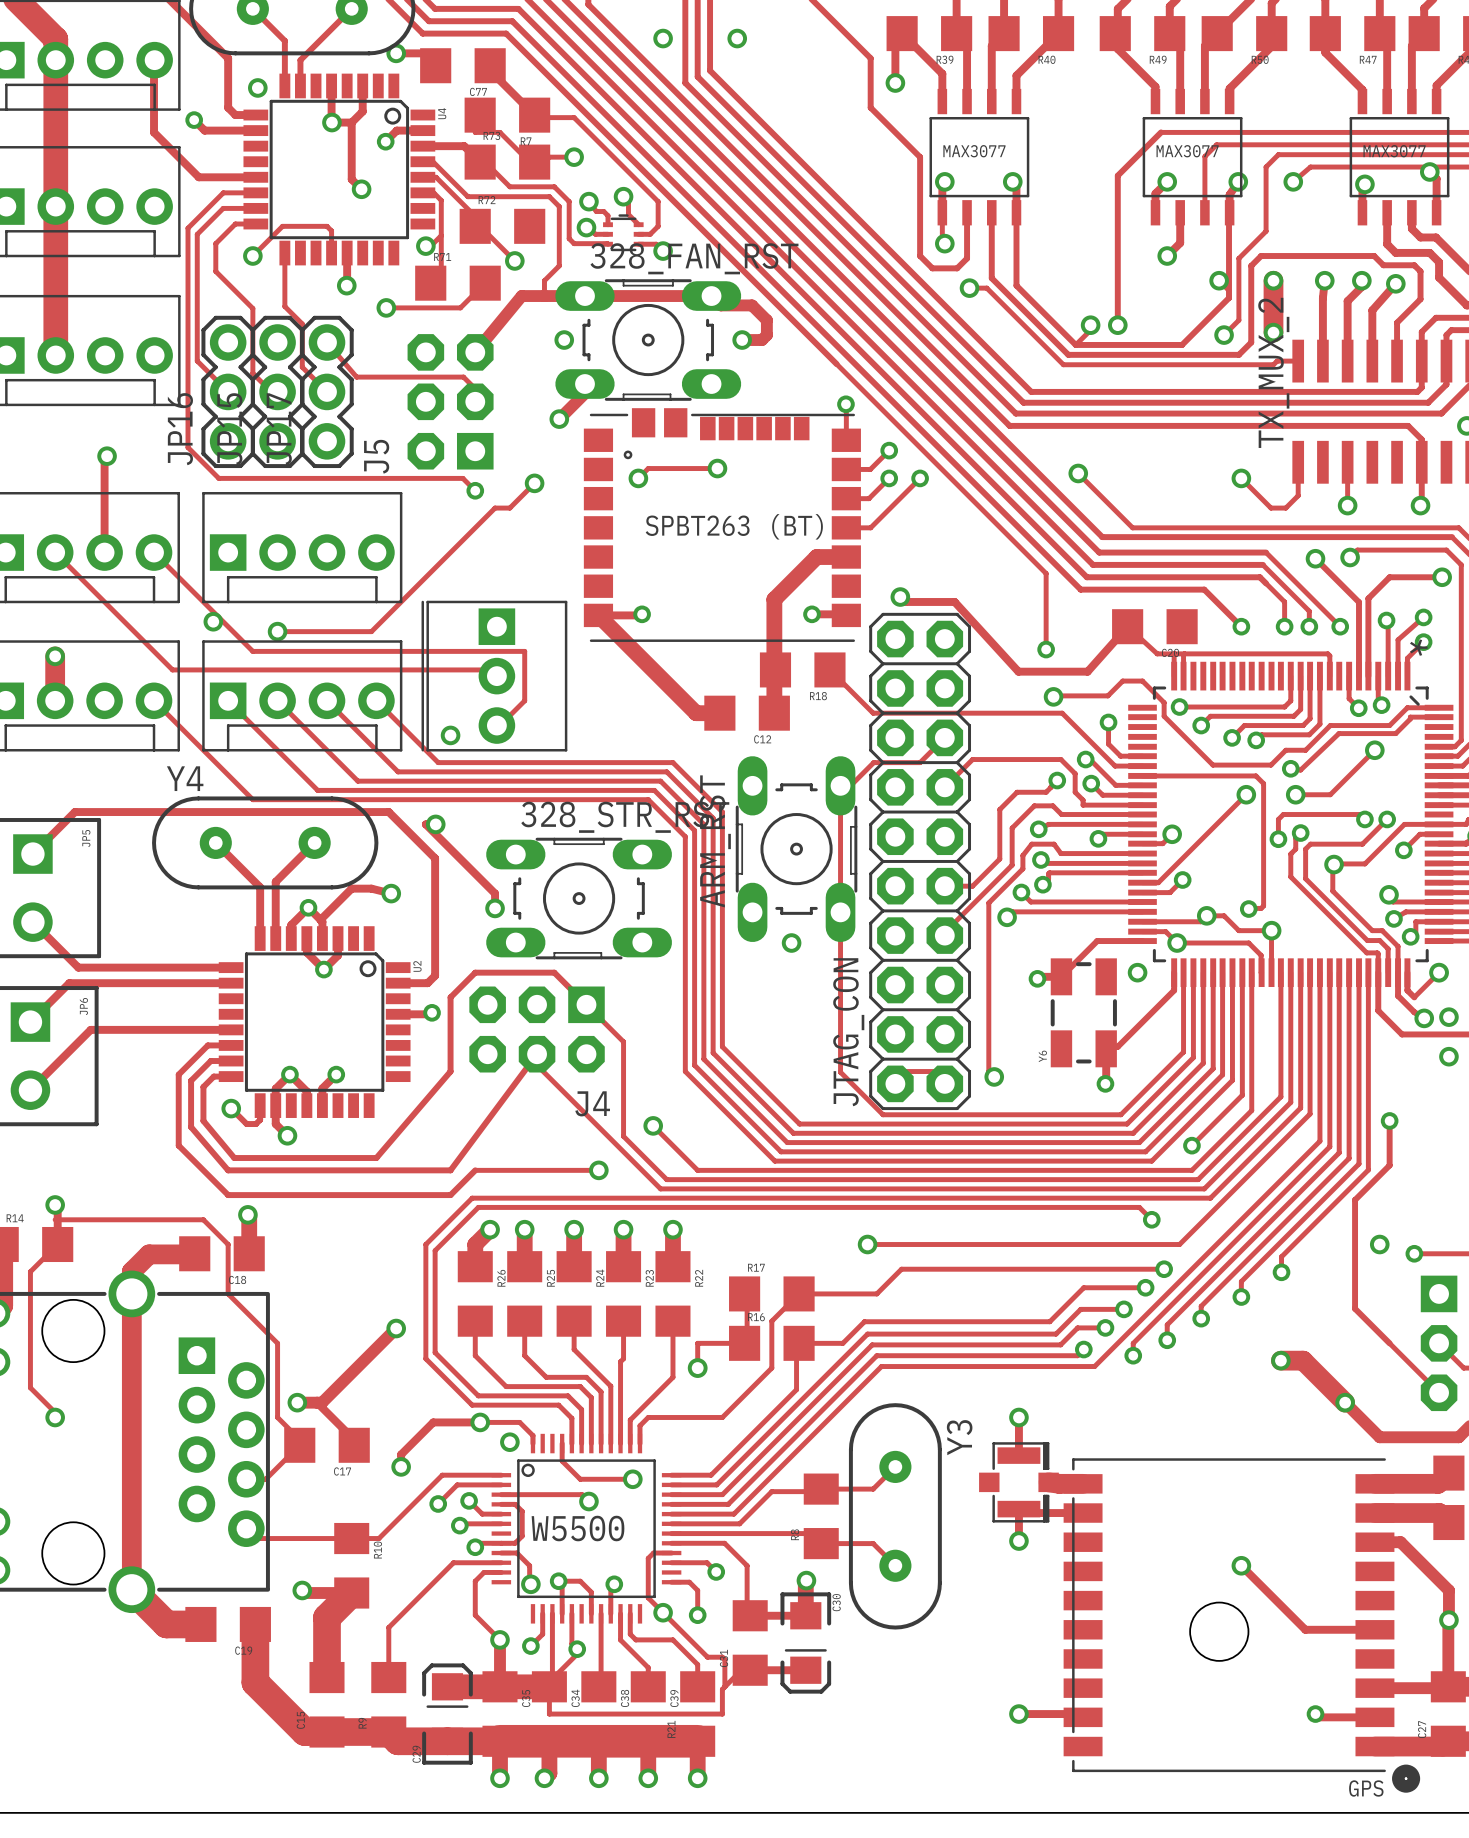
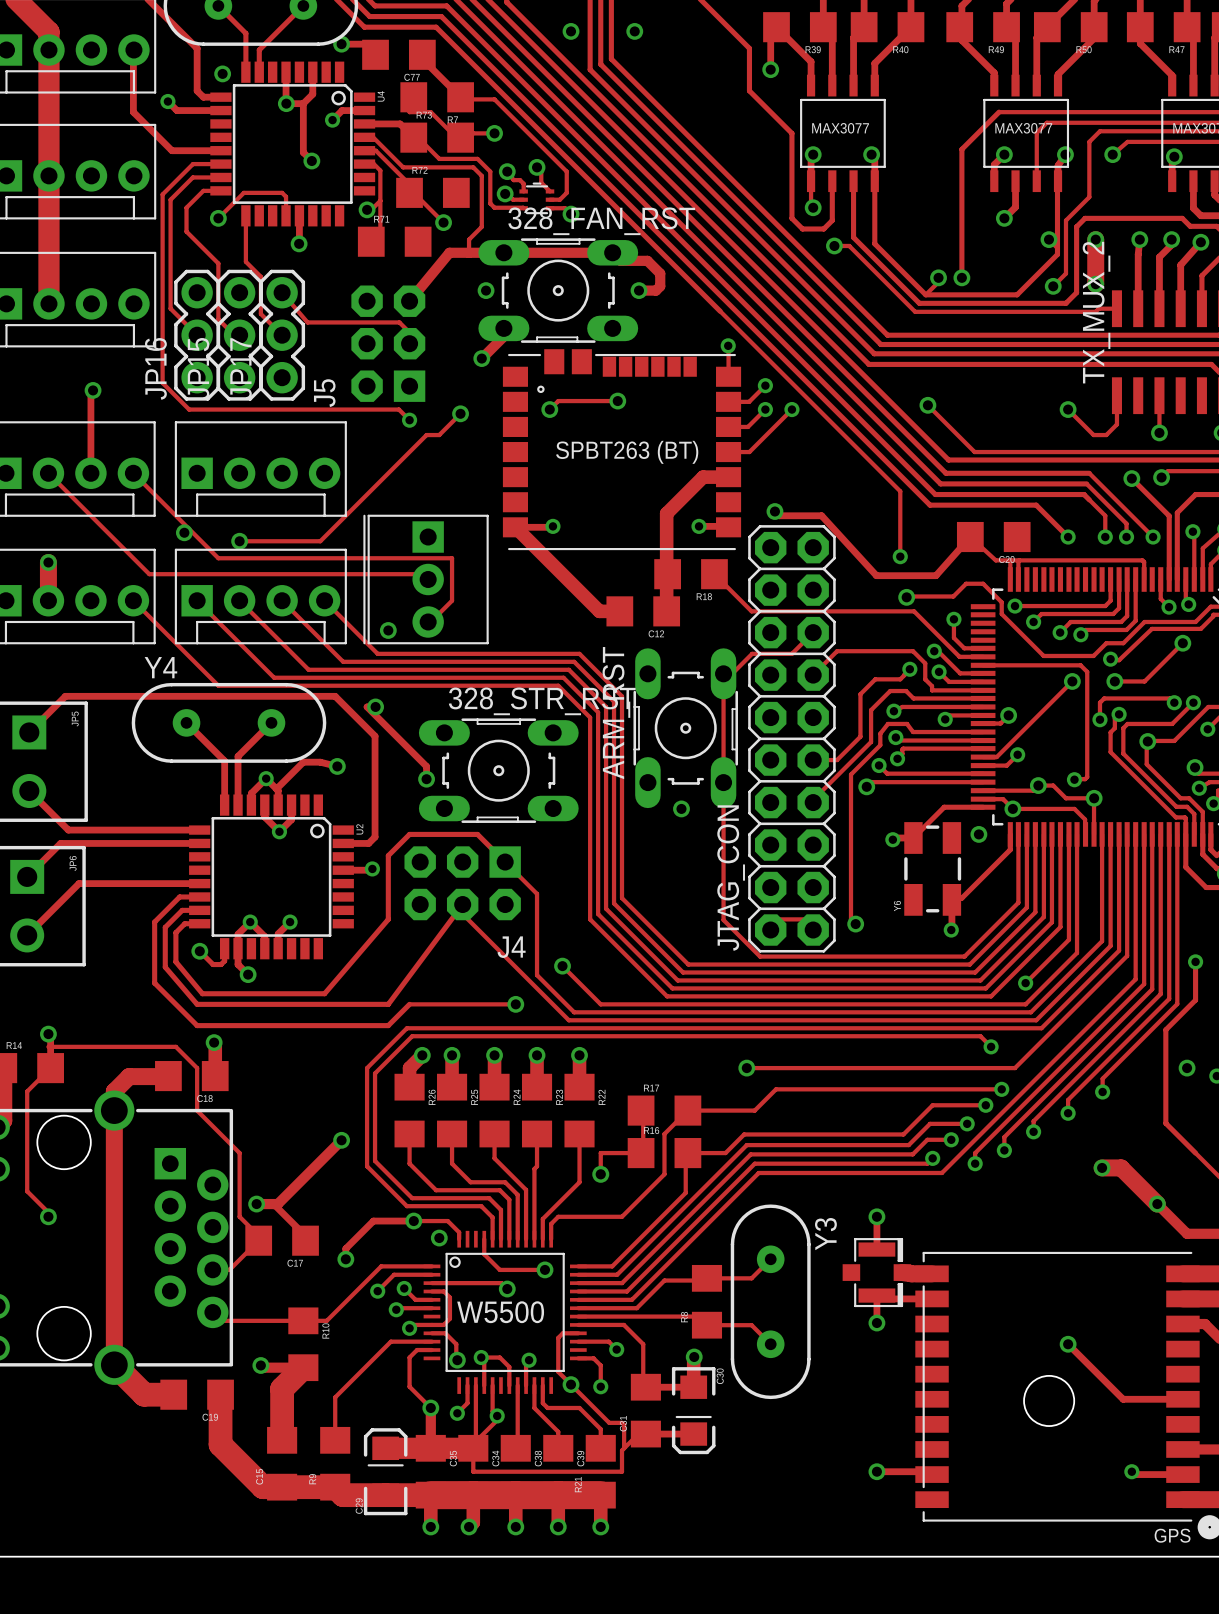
track: (485, 283) (460, 307) (386, 307) -> none
via: (386, 307) -> none

